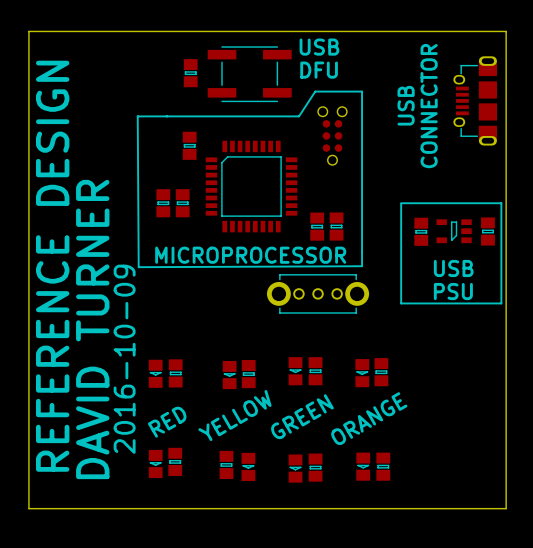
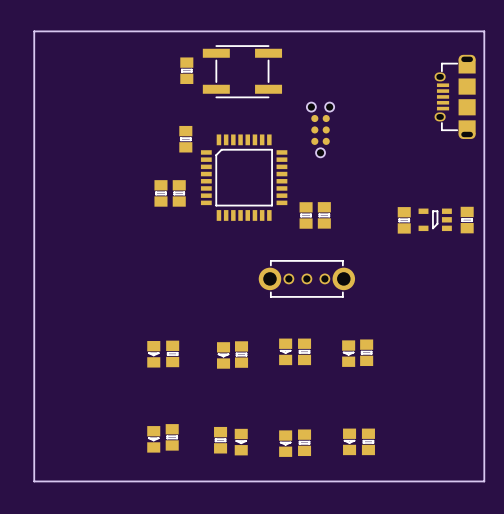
text: USB (319, 47) -> none
text: DFU (319, 70) -> none
line: (315, 91) (362, 91) (362, 266) (138, 267) (137, 116) (299, 116) (315, 91) -> none
text: USB (406, 105) -> none
text: CONNECTOR (429, 106) -> none
line: (401, 203) (501, 203) (501, 303) (401, 303) (401, 204) -> none
text: MICROPROCESSOR (250, 255) -> none
text: REFERENCE DESIGN (52, 266) -> none
text: USB (453, 268) -> none
text: PSU (453, 291) -> none
text: DAVID TURNER (92, 329) -> none
text: 2016-10-09 (124, 359) -> none
text: YELLOW (234, 415) -> none
text: GREEN (302, 416) -> none
text: ORANGE (369, 418) -> none
text: RED (167, 422) -> none

